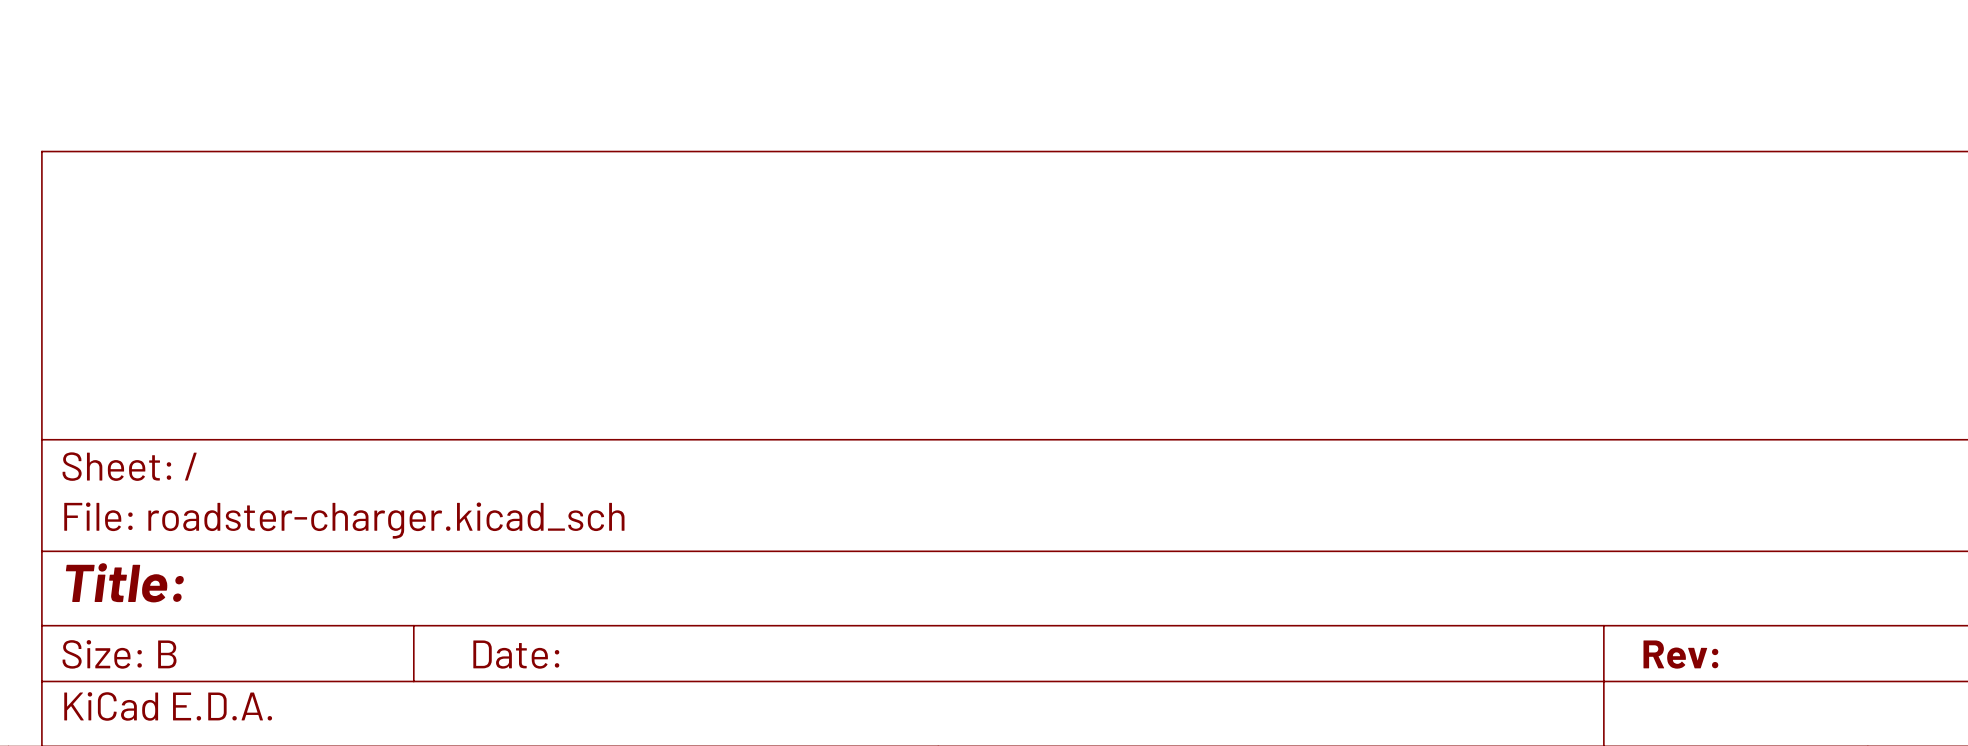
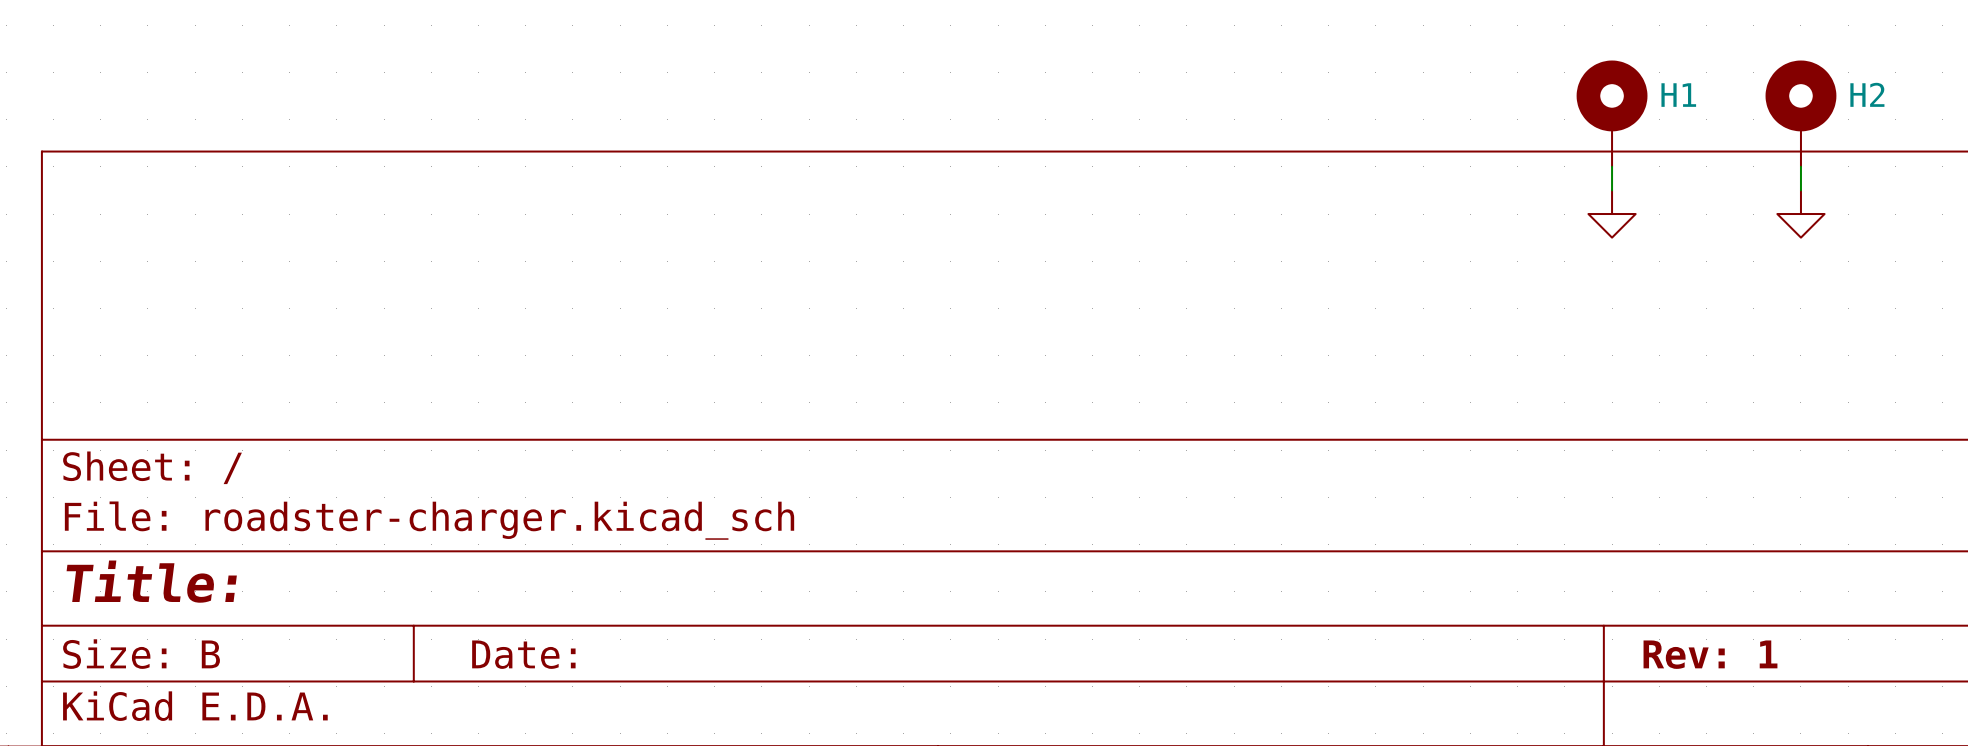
H1: none -> (1612, 113)
H2: none -> (1800, 113)
wire: none -> (1612, 166) (1612, 190)
wire: none -> (1800, 166) (1800, 190)
power symbol: none -> (1612, 214)
power symbol: none -> (1800, 214)
title block: Rev: (1680, 654) -> Rev: 1 (1710, 654)

